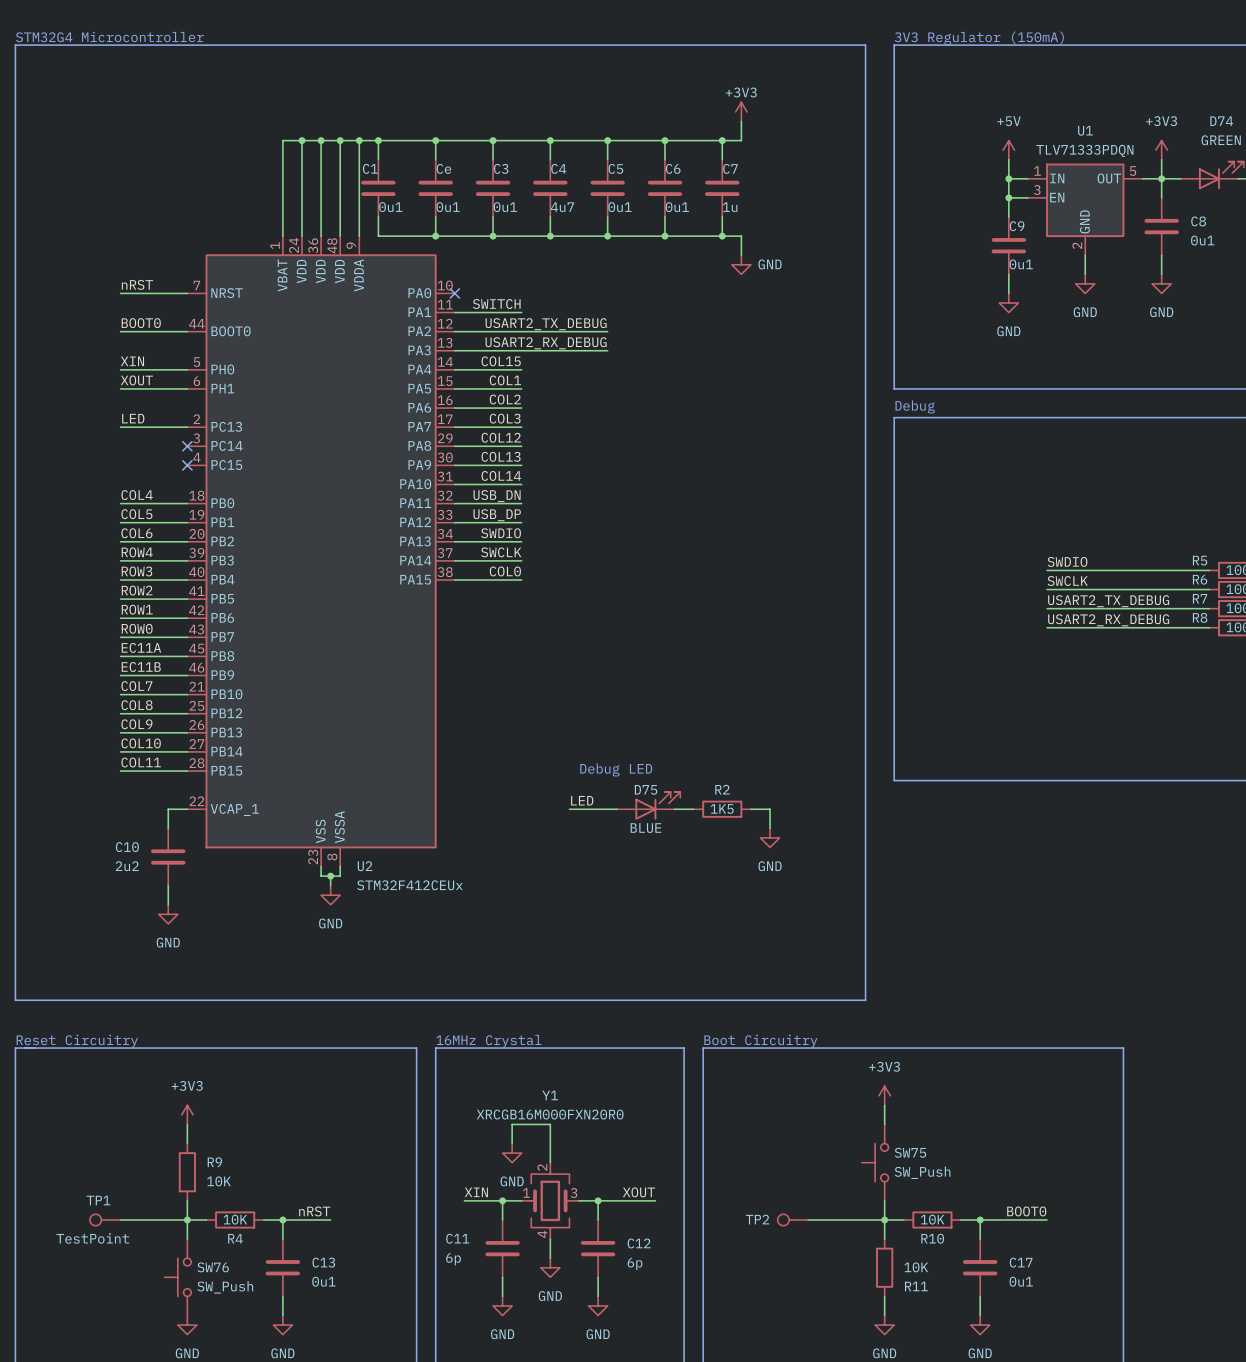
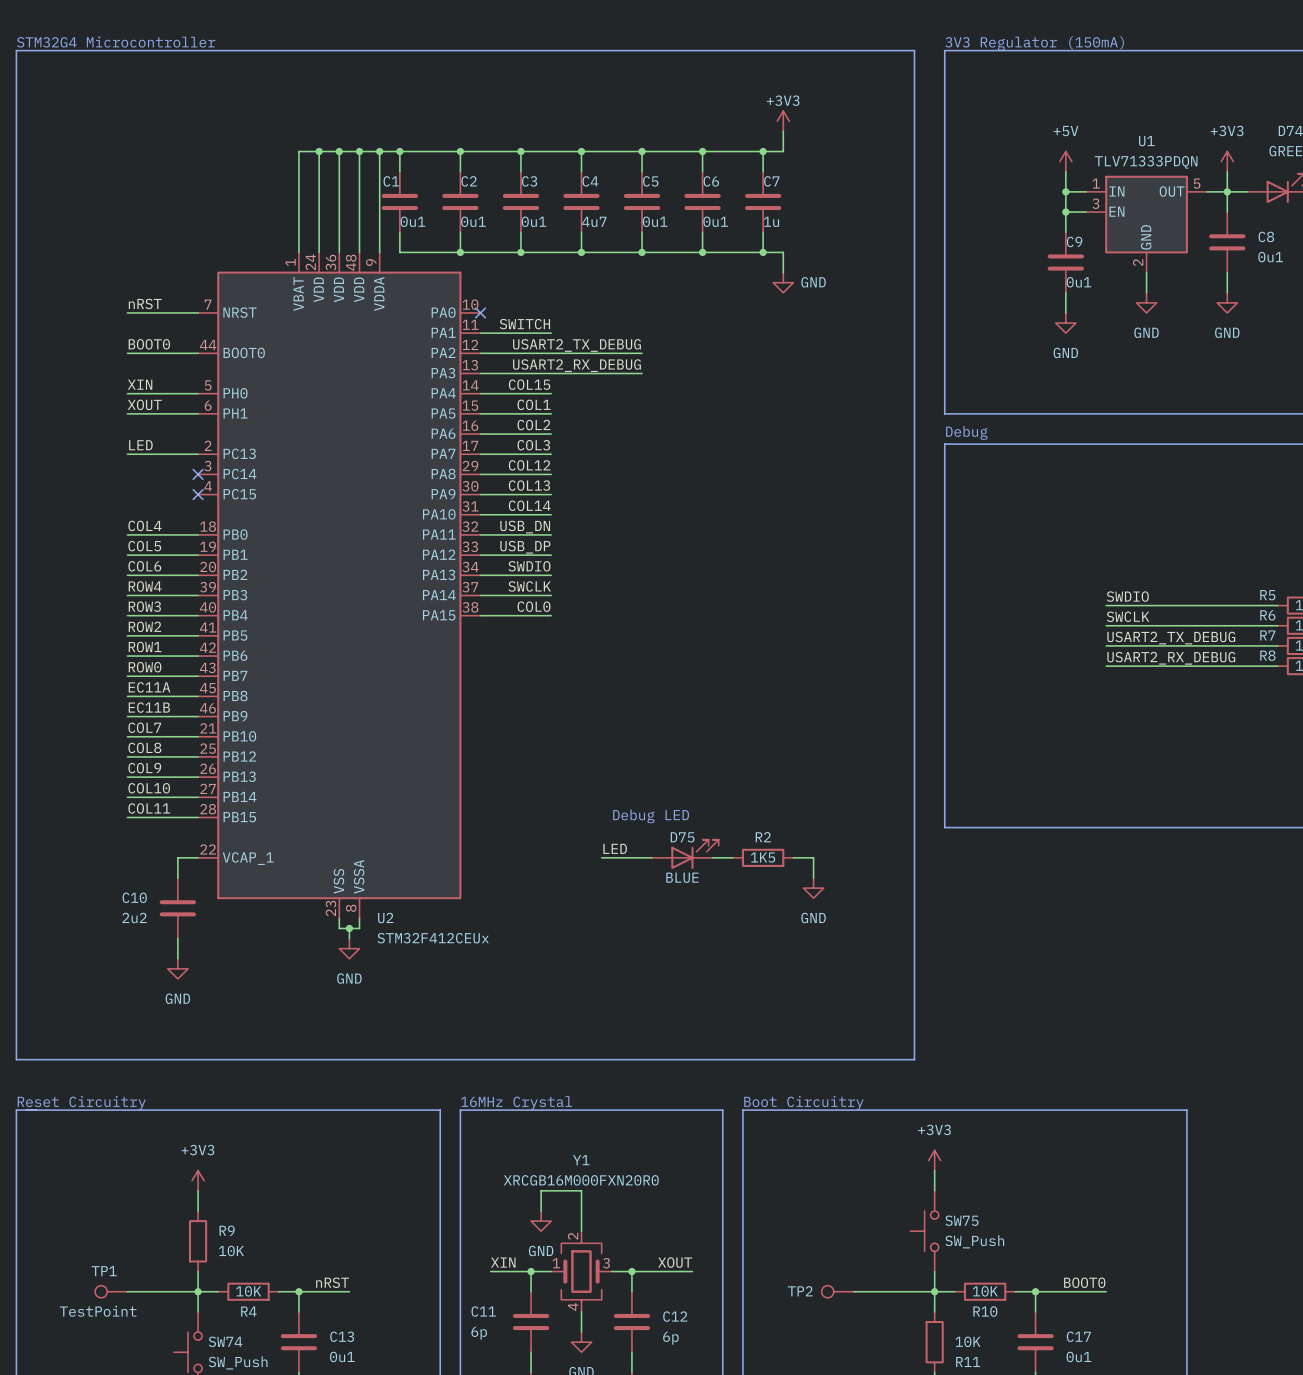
Ce name: Ce (443, 168) -> C2 (469, 181)
SW76 name: SW76 (213, 1267) -> SW74 (225, 1341)

